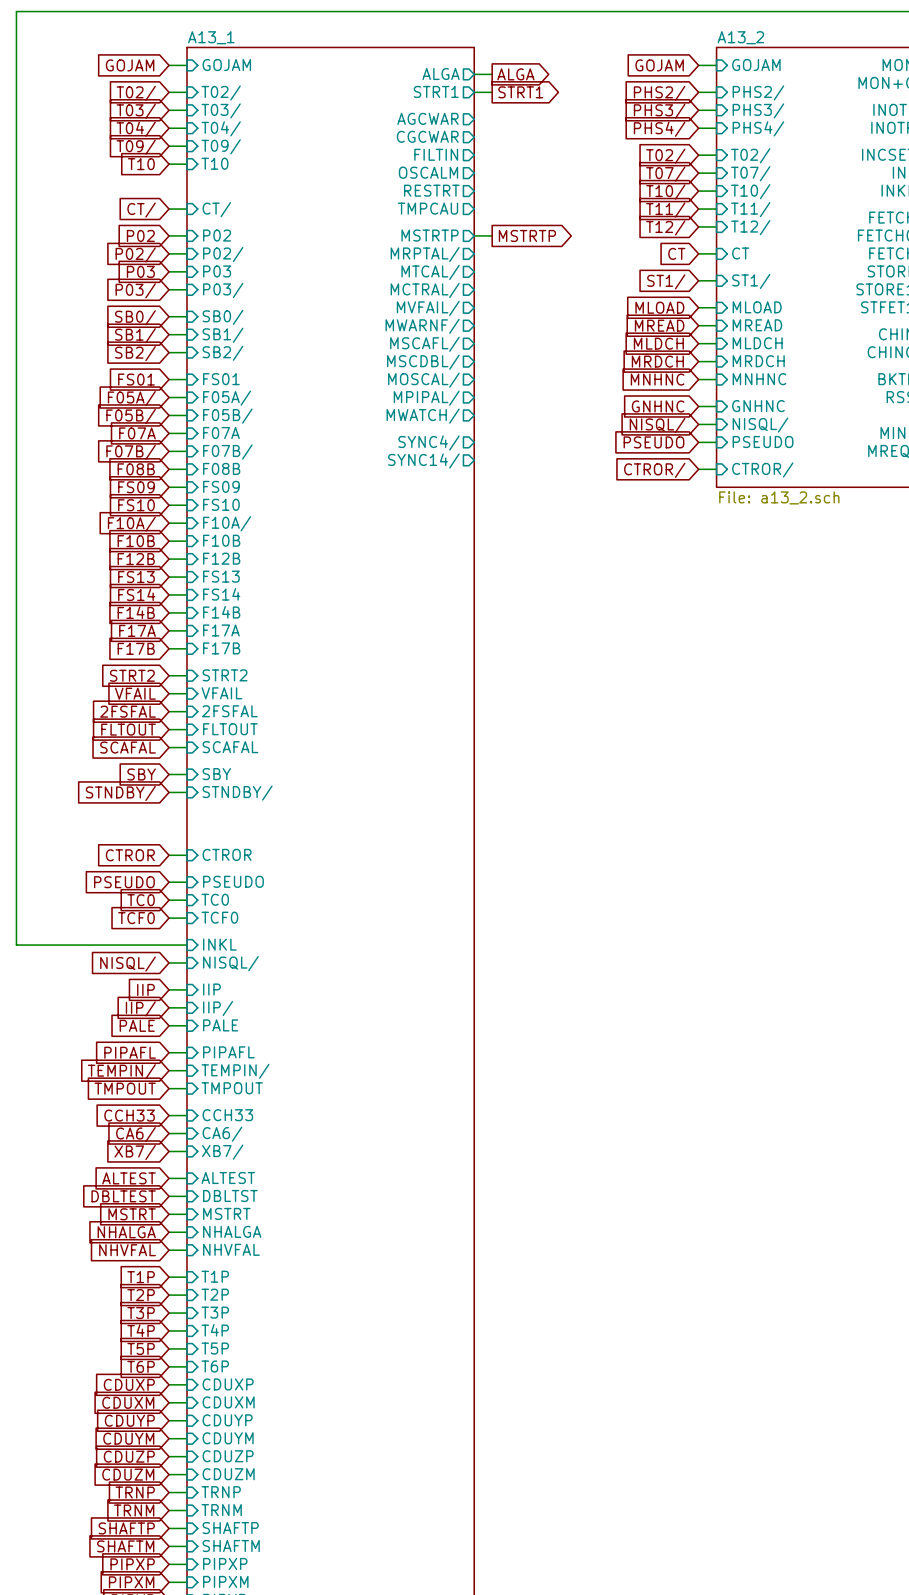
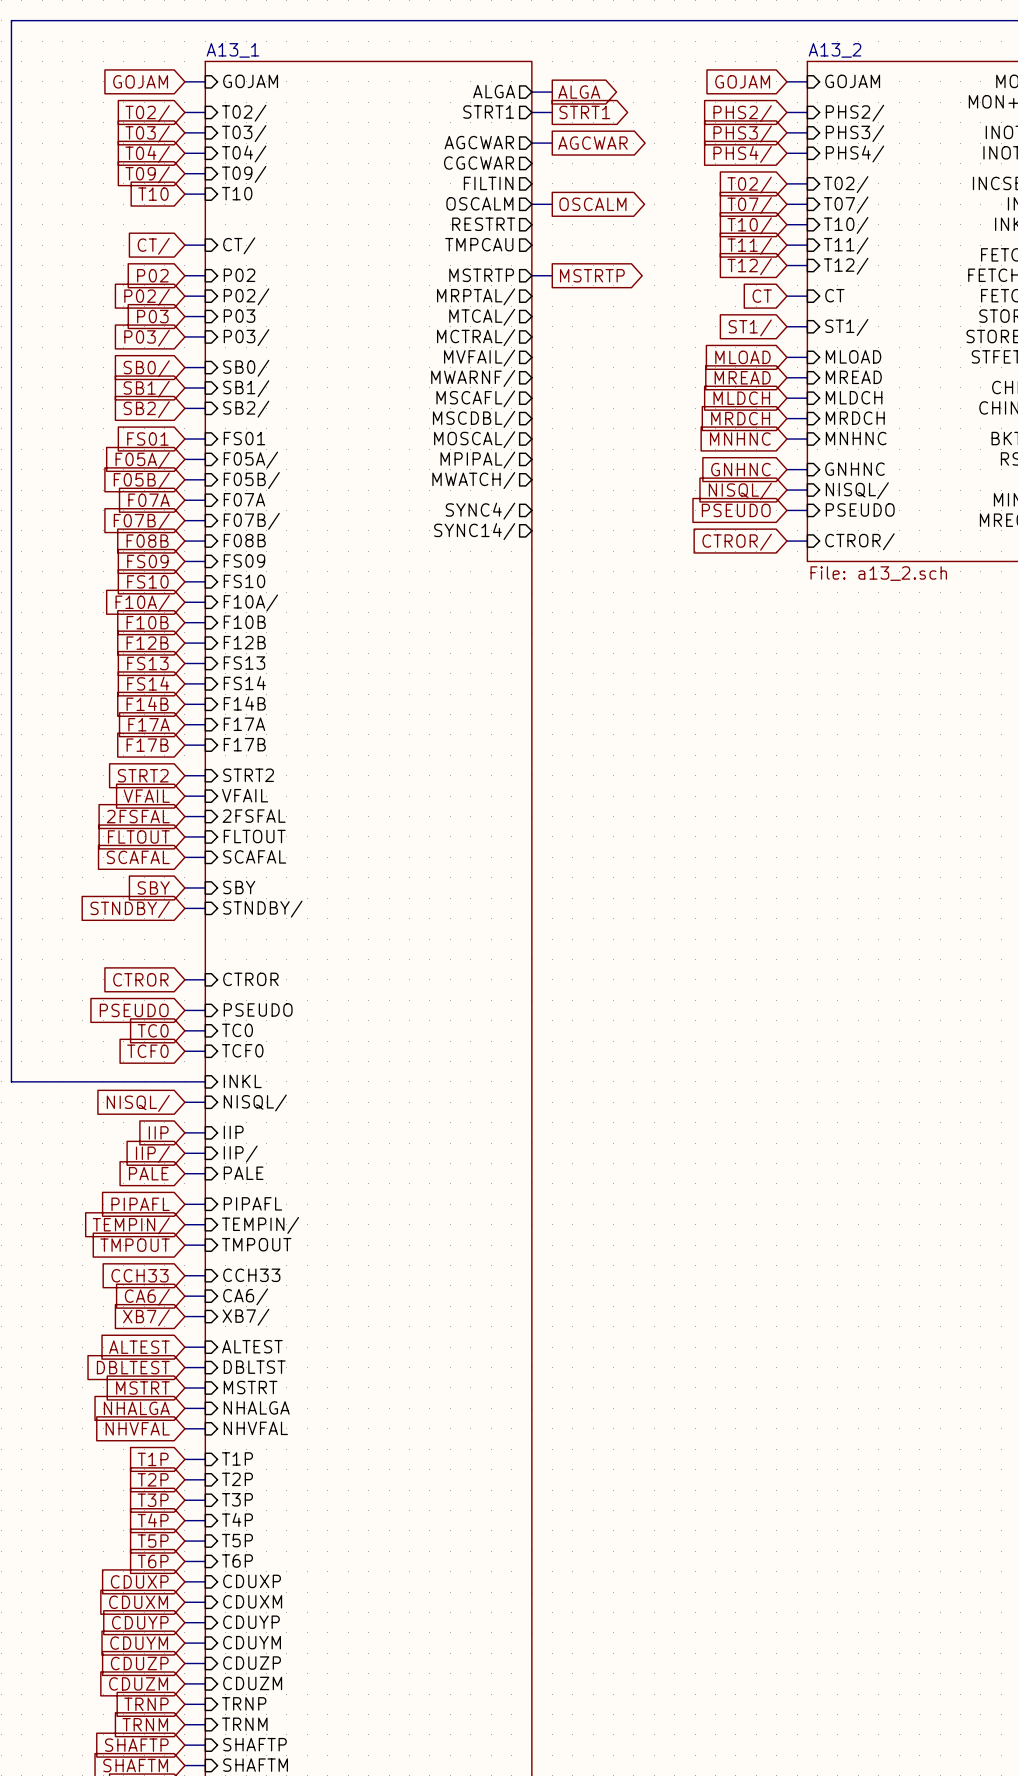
wire: none -> (531, 143) (552, 143)
global label: none -> AGCWAR (592, 143)
wire: none -> (531, 204) (552, 204)
global label: none -> OSCALM (592, 204)

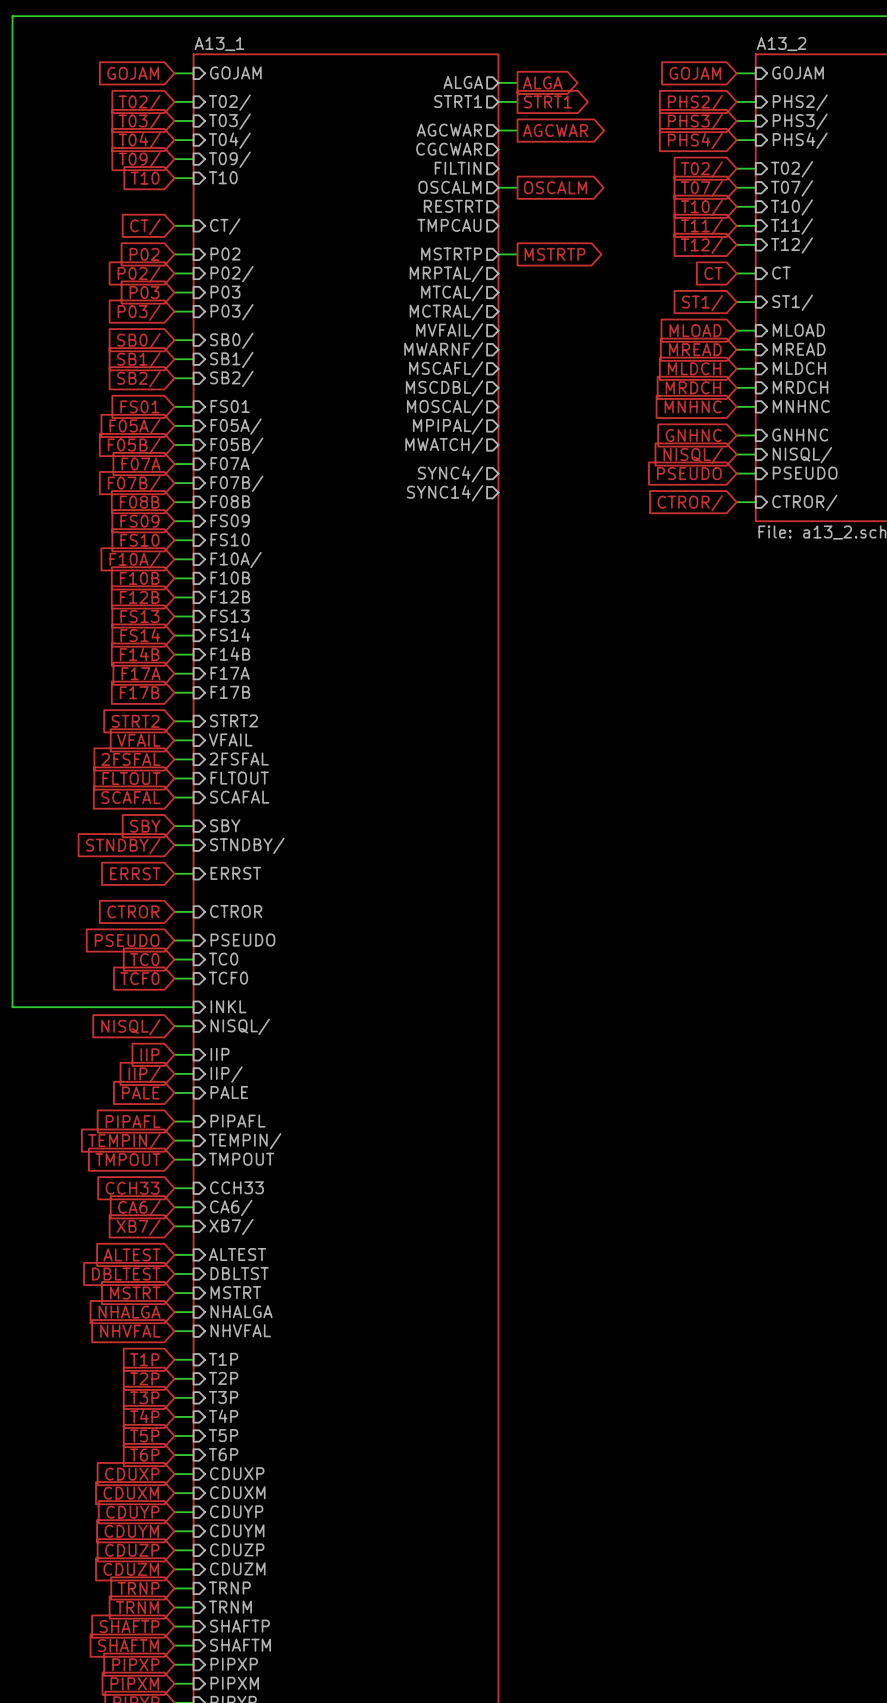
sheet pin: none -> ERRST (235, 873)
global label: none -> ERRST (135, 873)
wire: none -> (174, 873) (193, 873)

